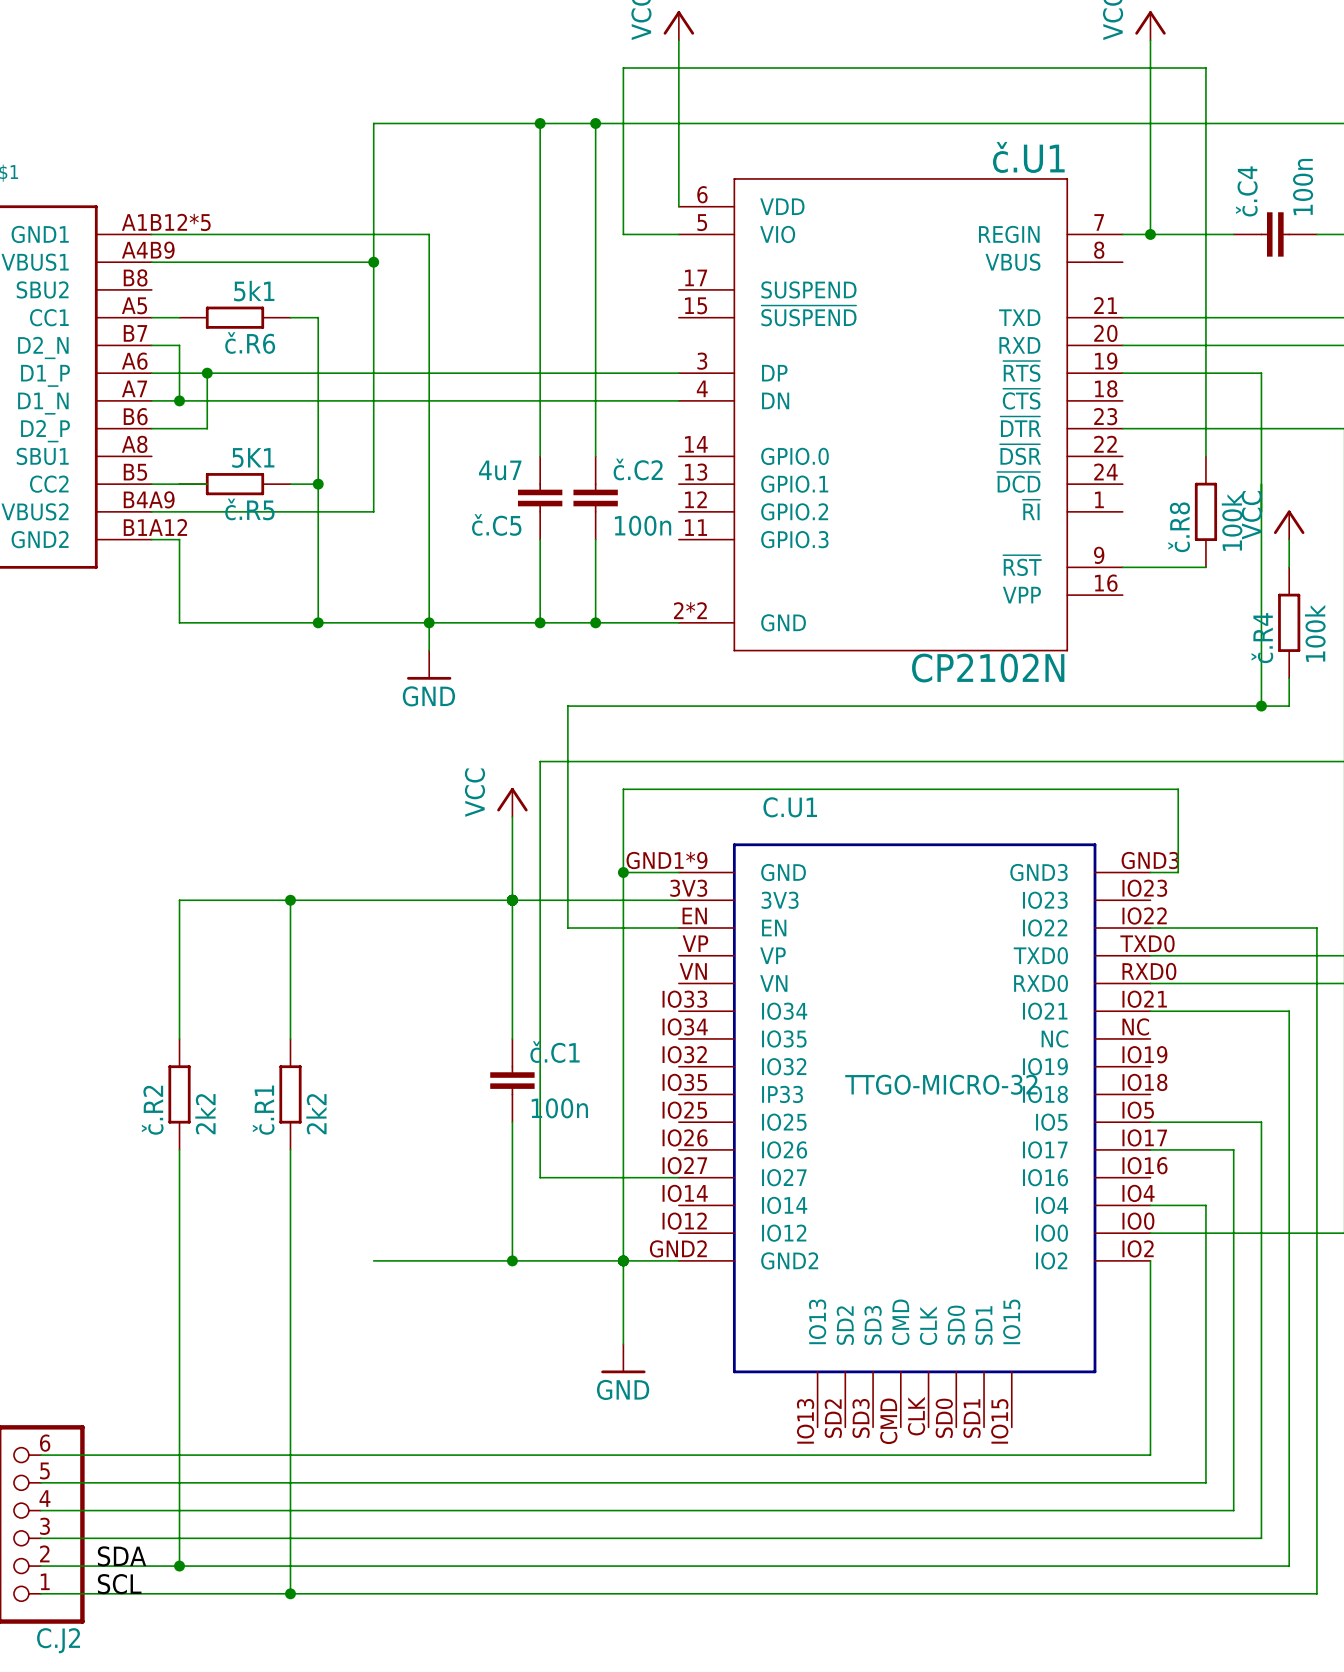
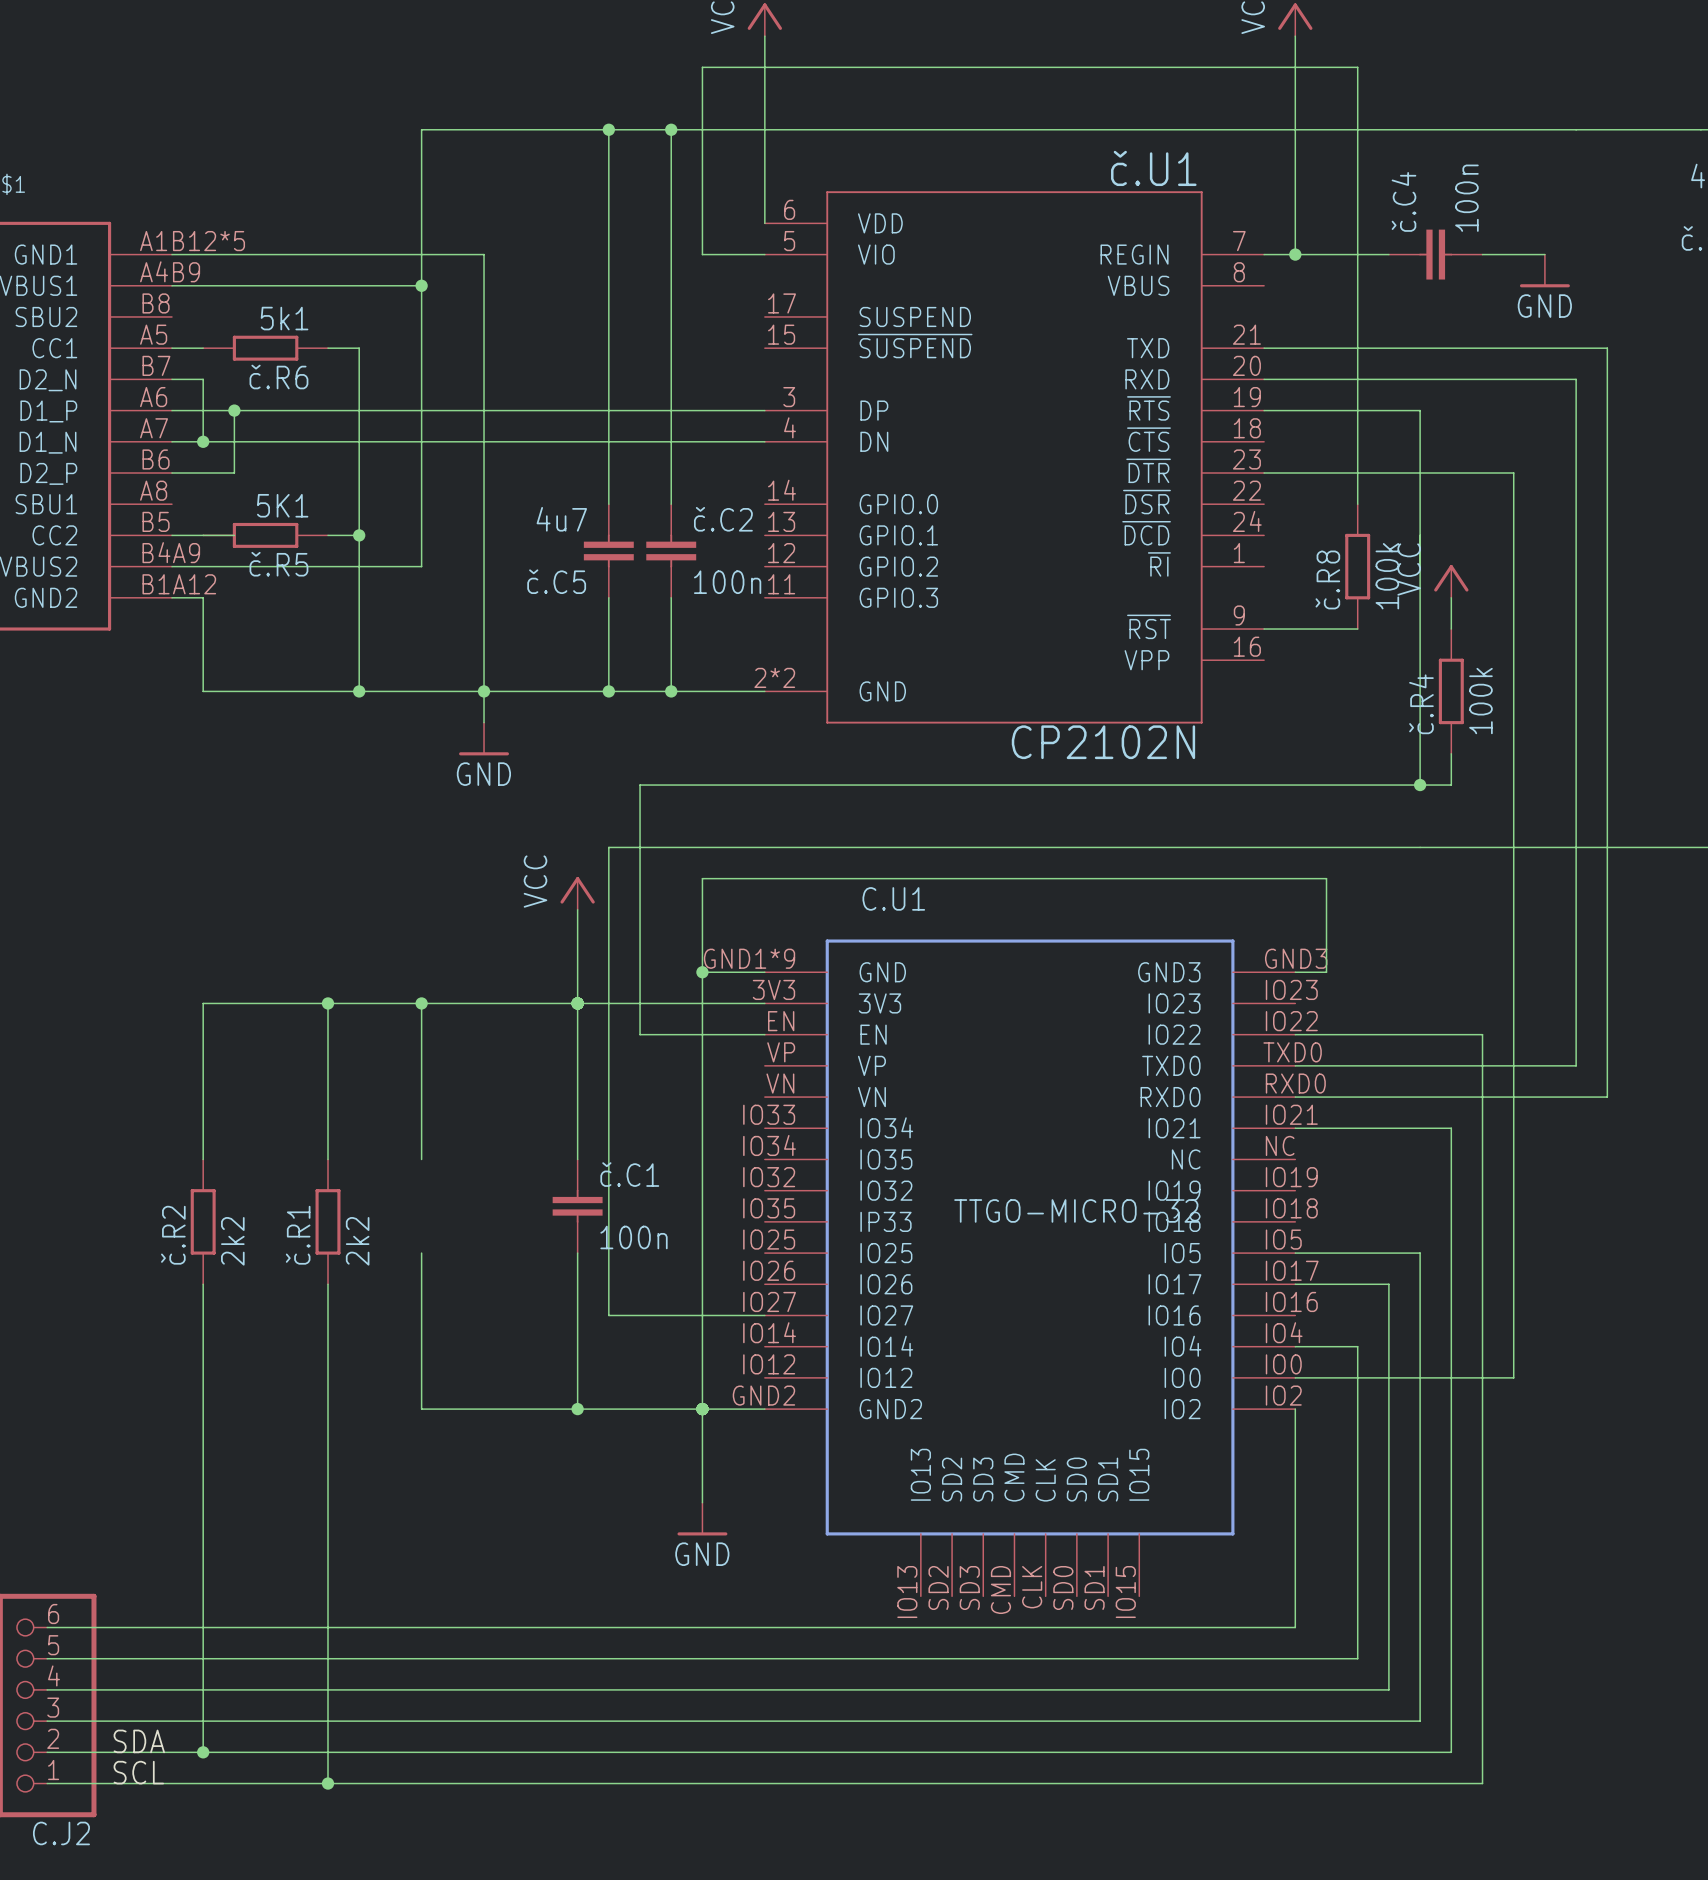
wire: none -> (421, 1003) (421, 1159)
junction: none -> (421, 1003)
wire: none -> (421, 1253) (421, 1409)

